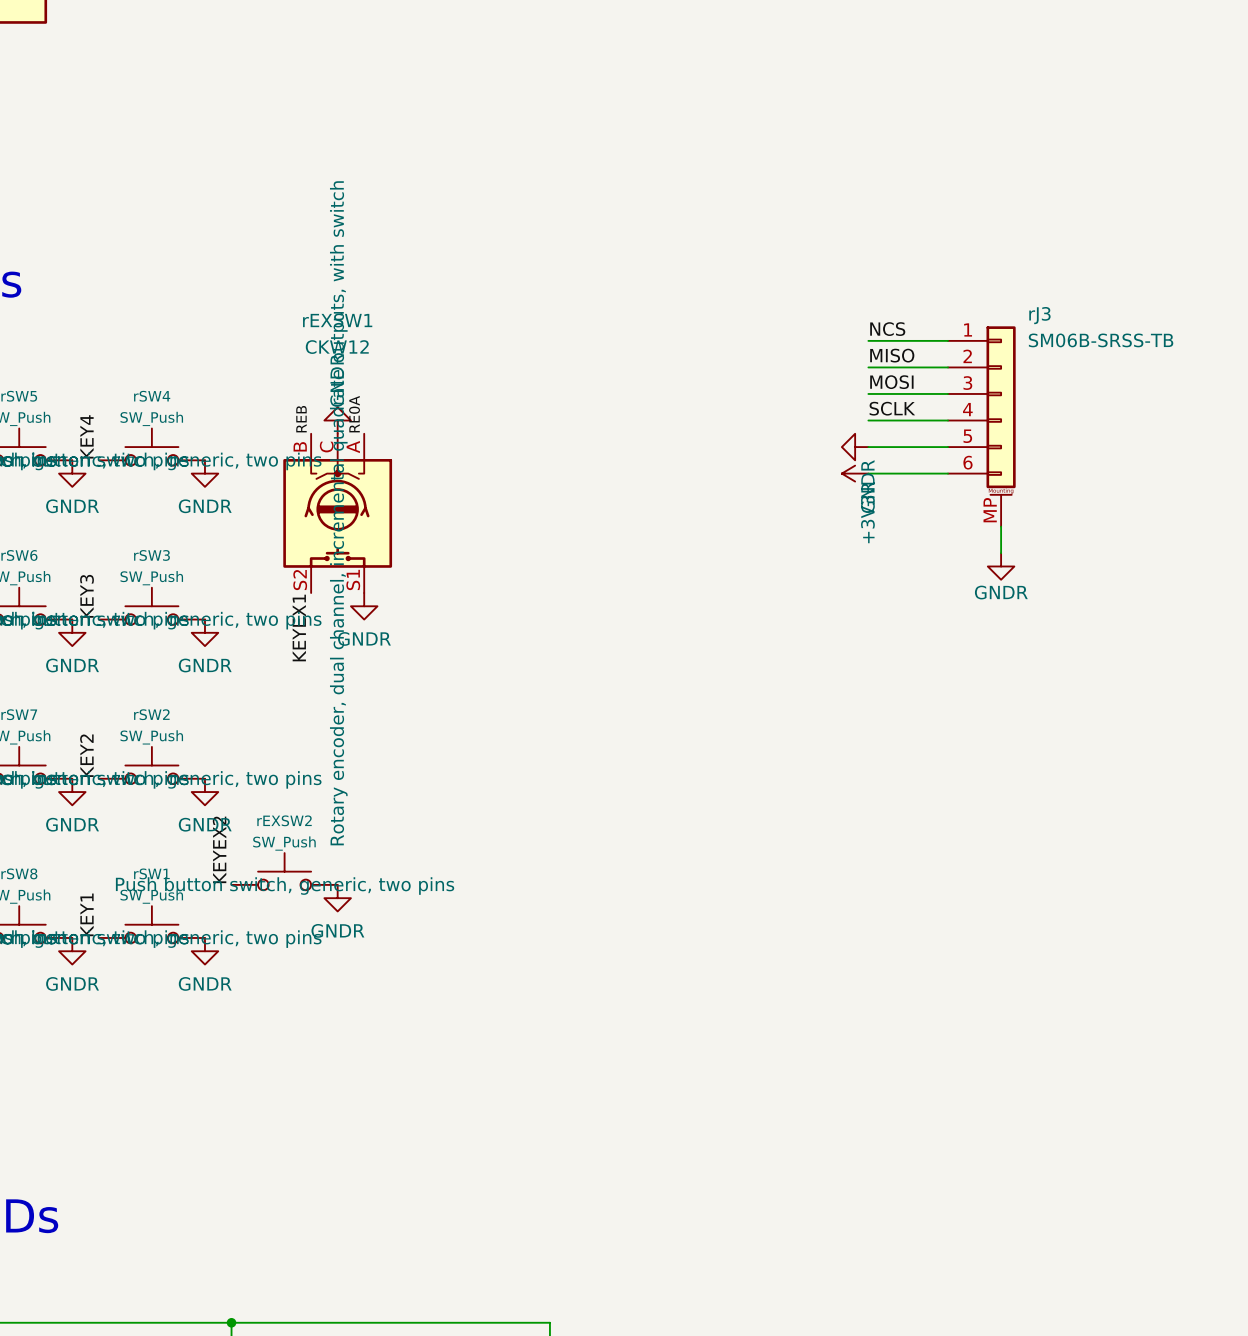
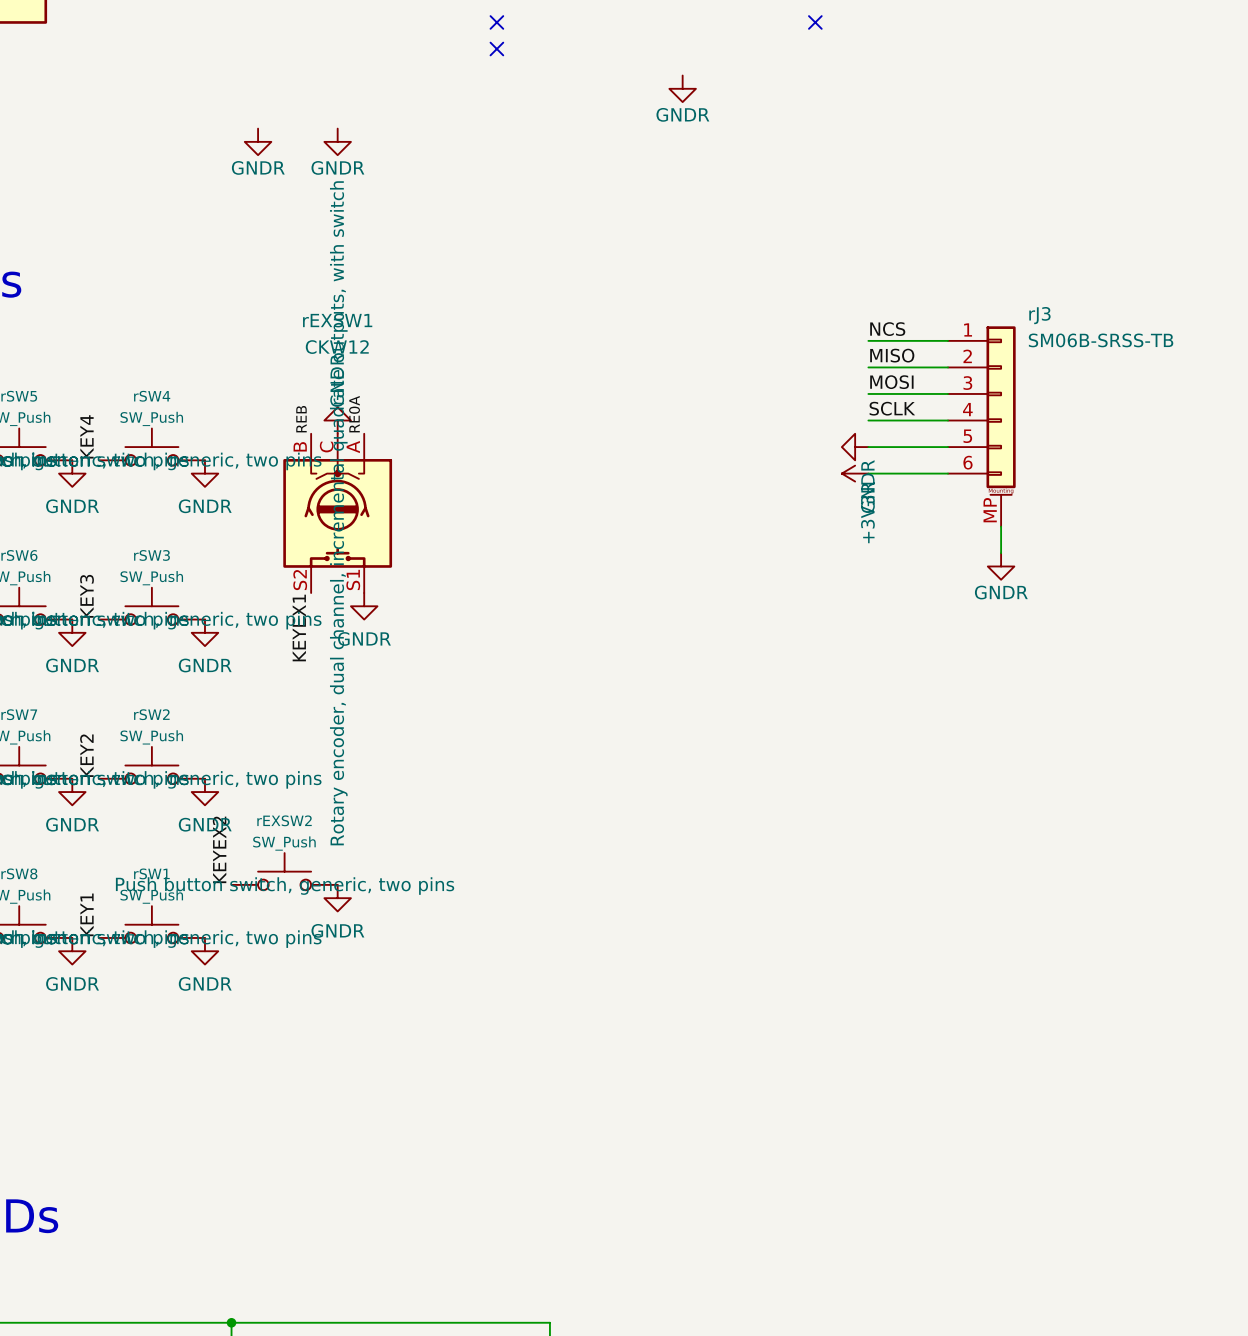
no-connect mark: none -> (496, 22)
no-connect mark: none -> (815, 22)
no-connect mark: none -> (496, 49)
power symbol: none -> GNDR (682, 88)
power symbol: none -> GNDR (258, 141)
power symbol: none -> GNDR (337, 141)

